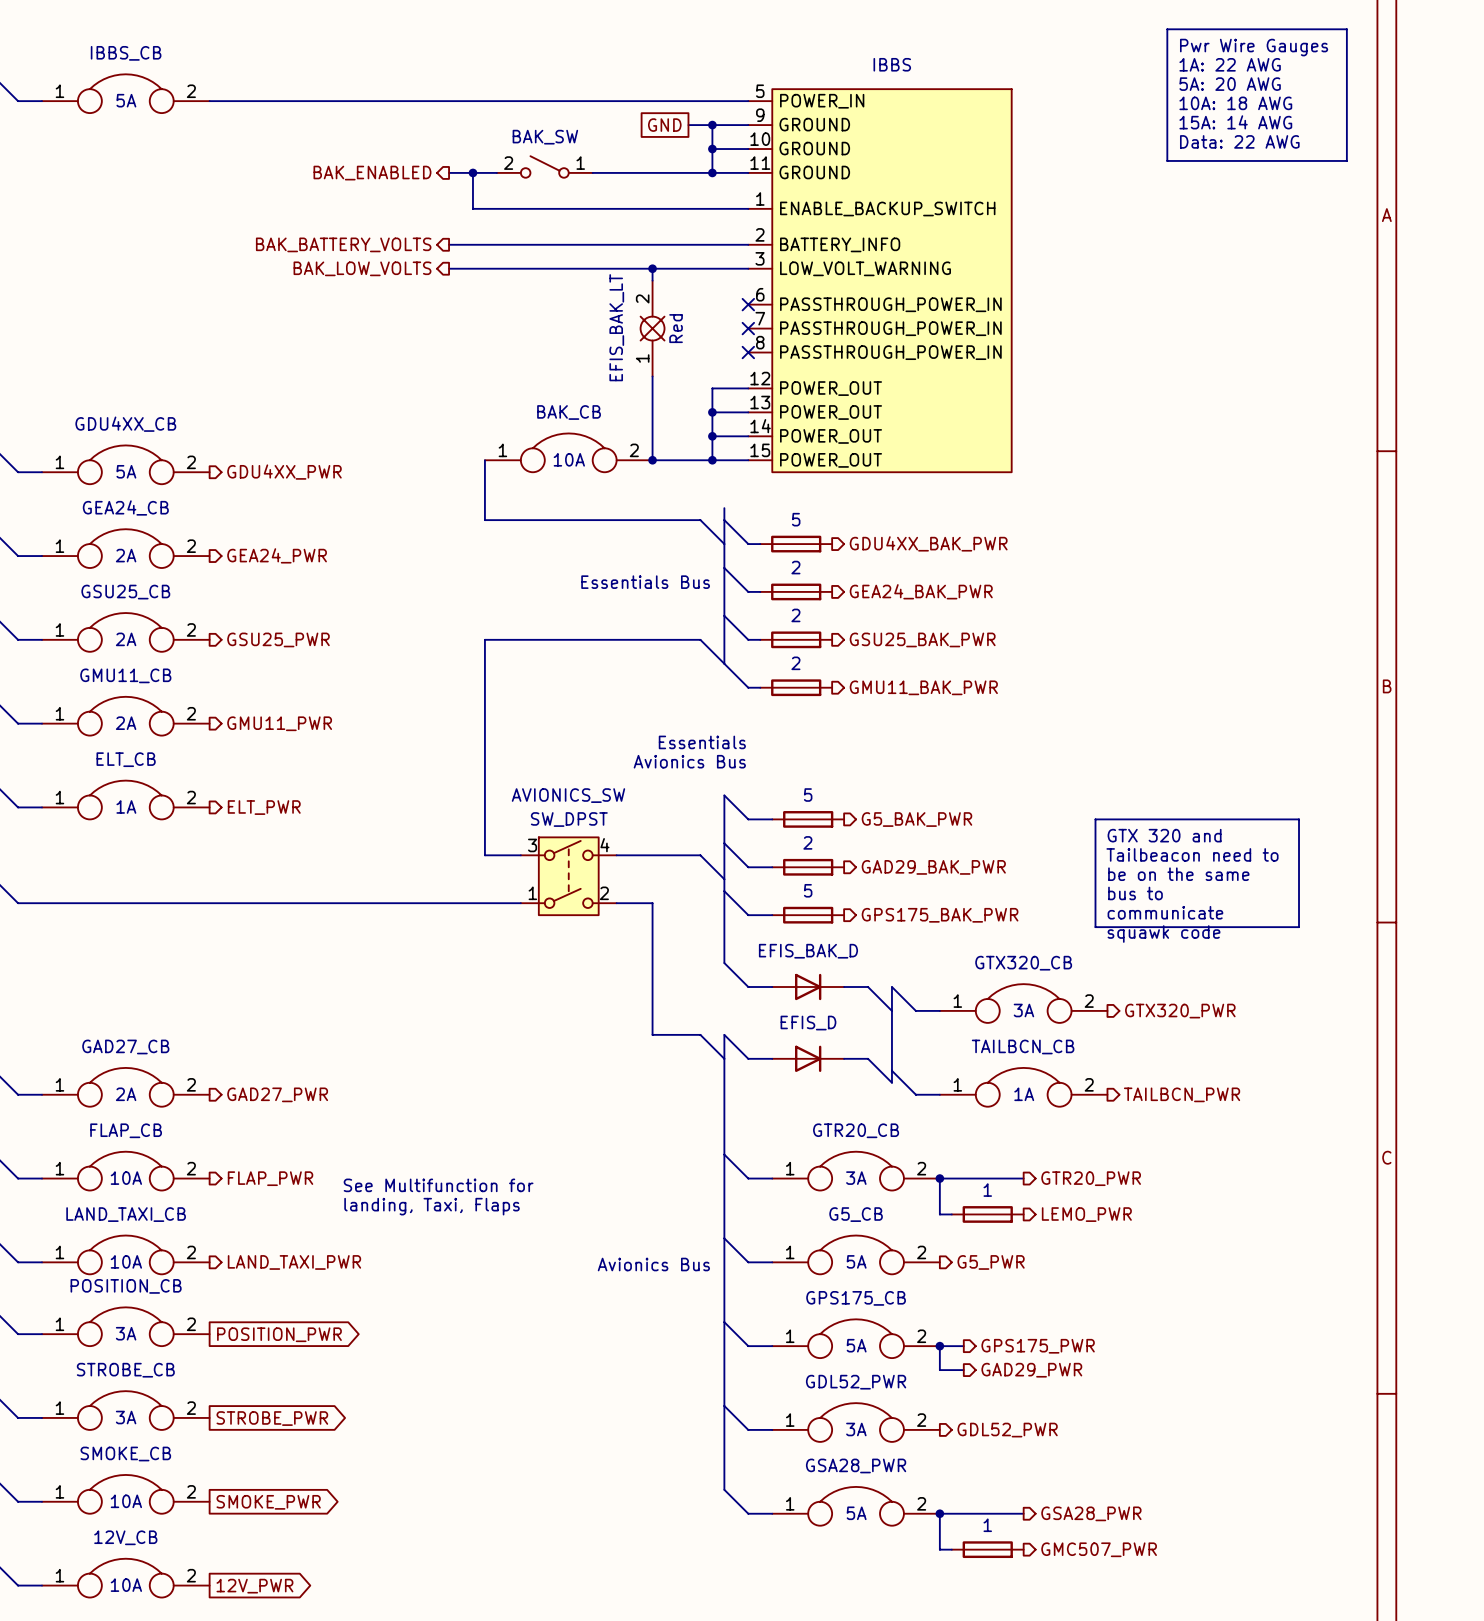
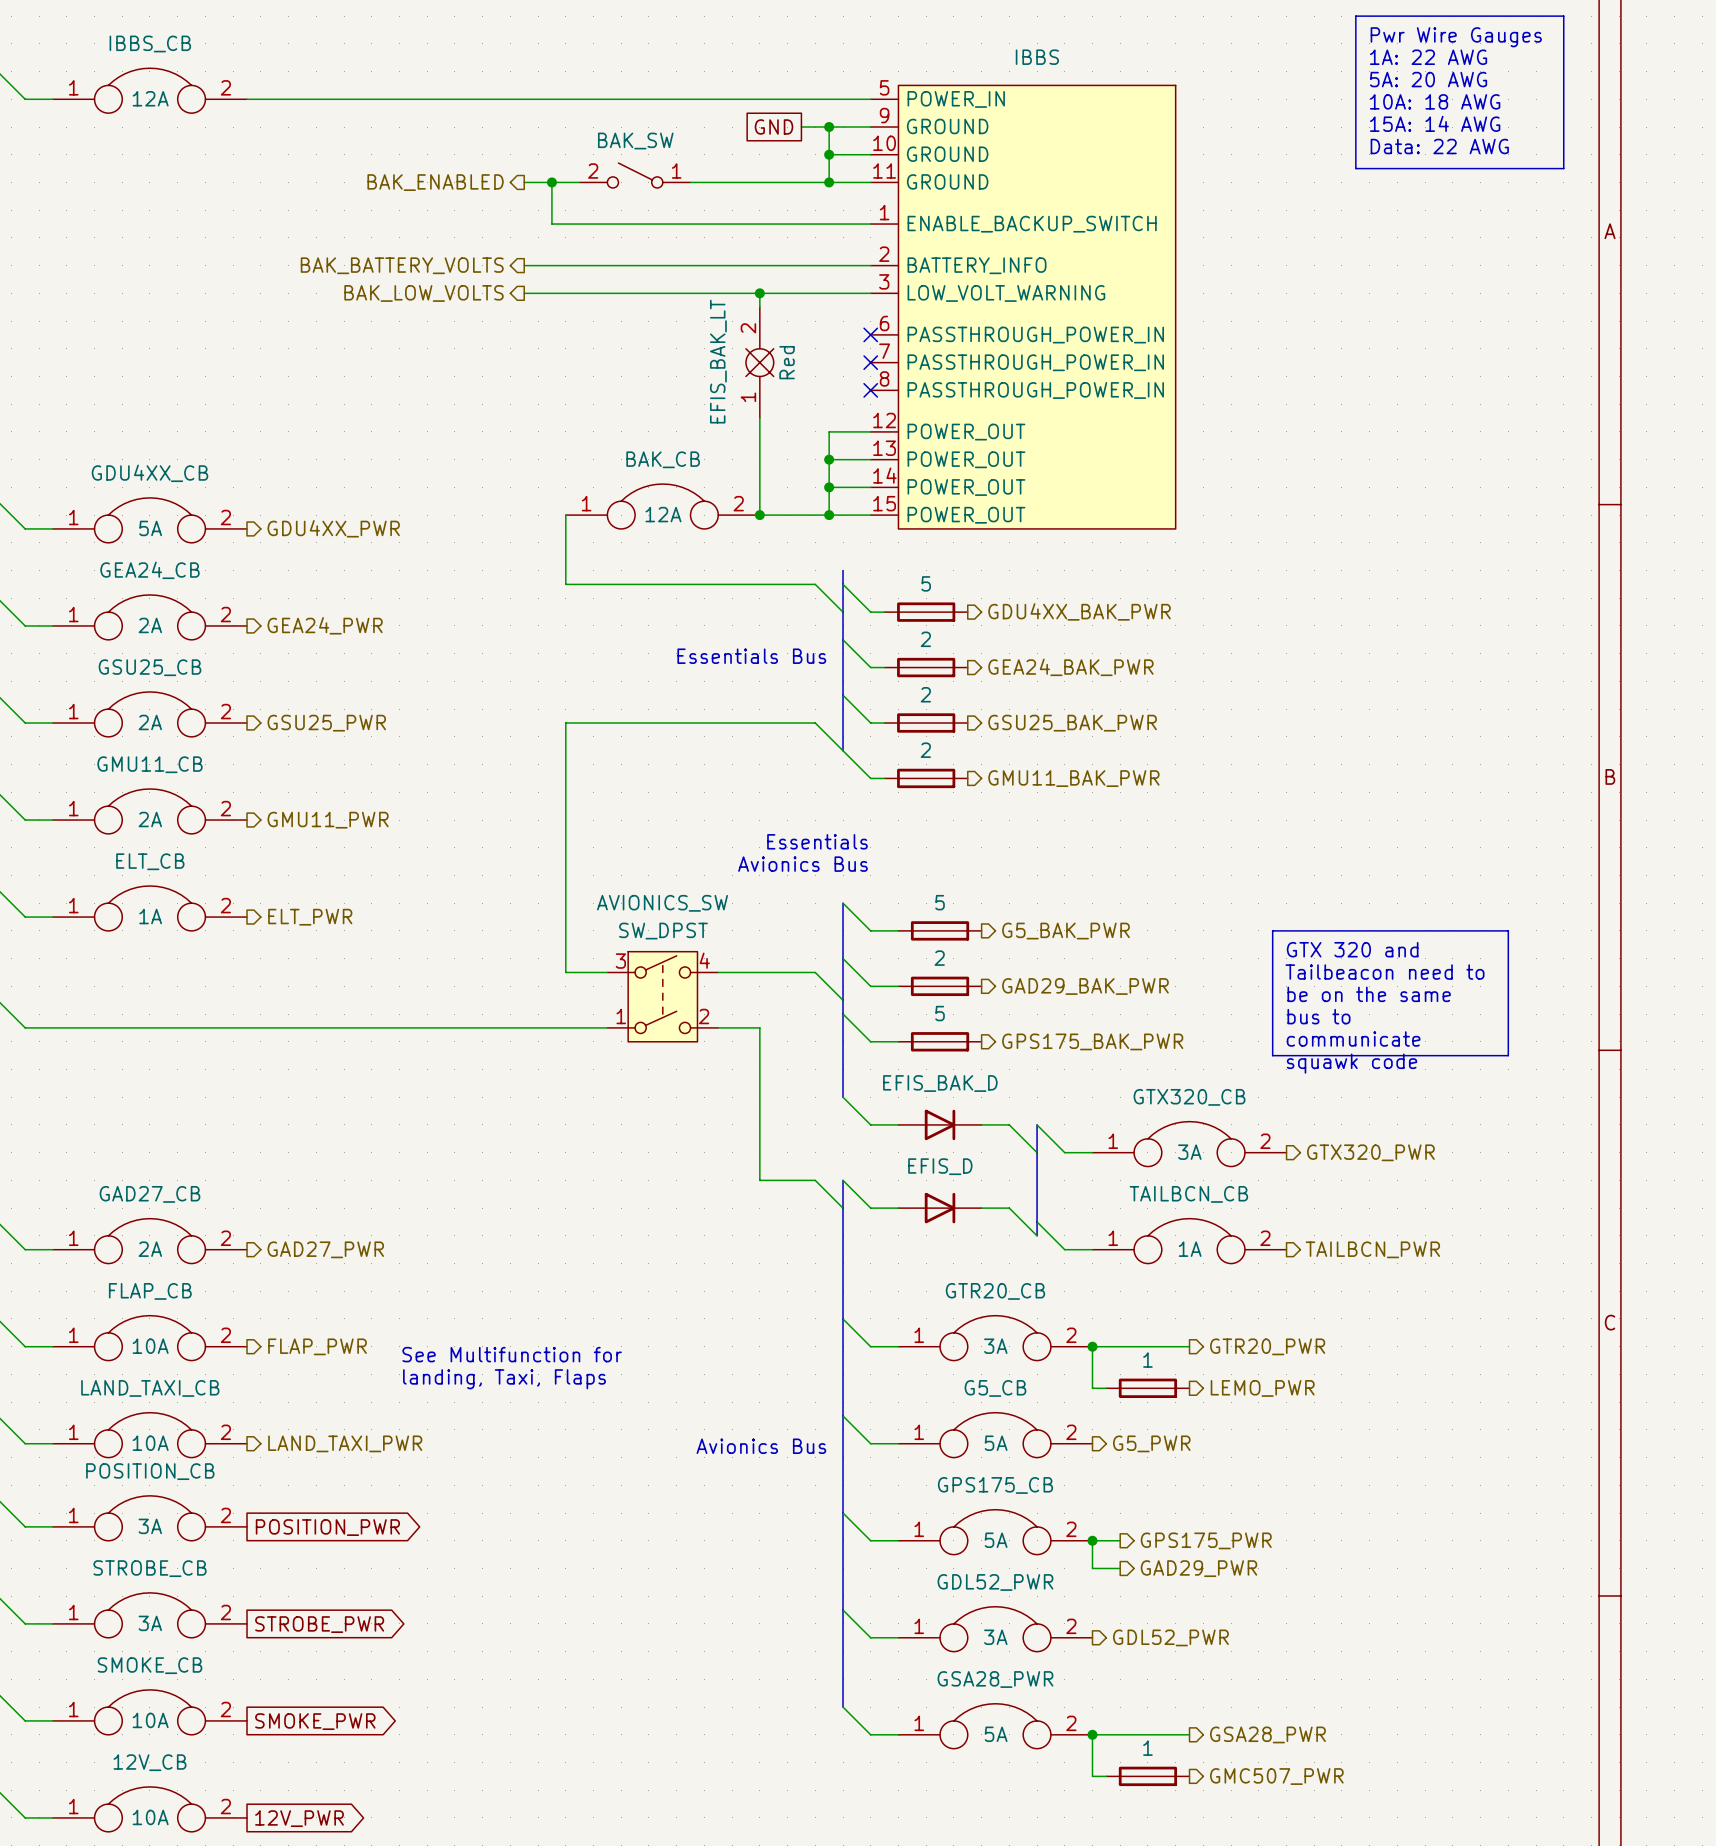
IBBS_CB value: 5A (126, 100) -> 12A (150, 98)
BAK_CB value: 10A (569, 459) -> 12A (663, 514)

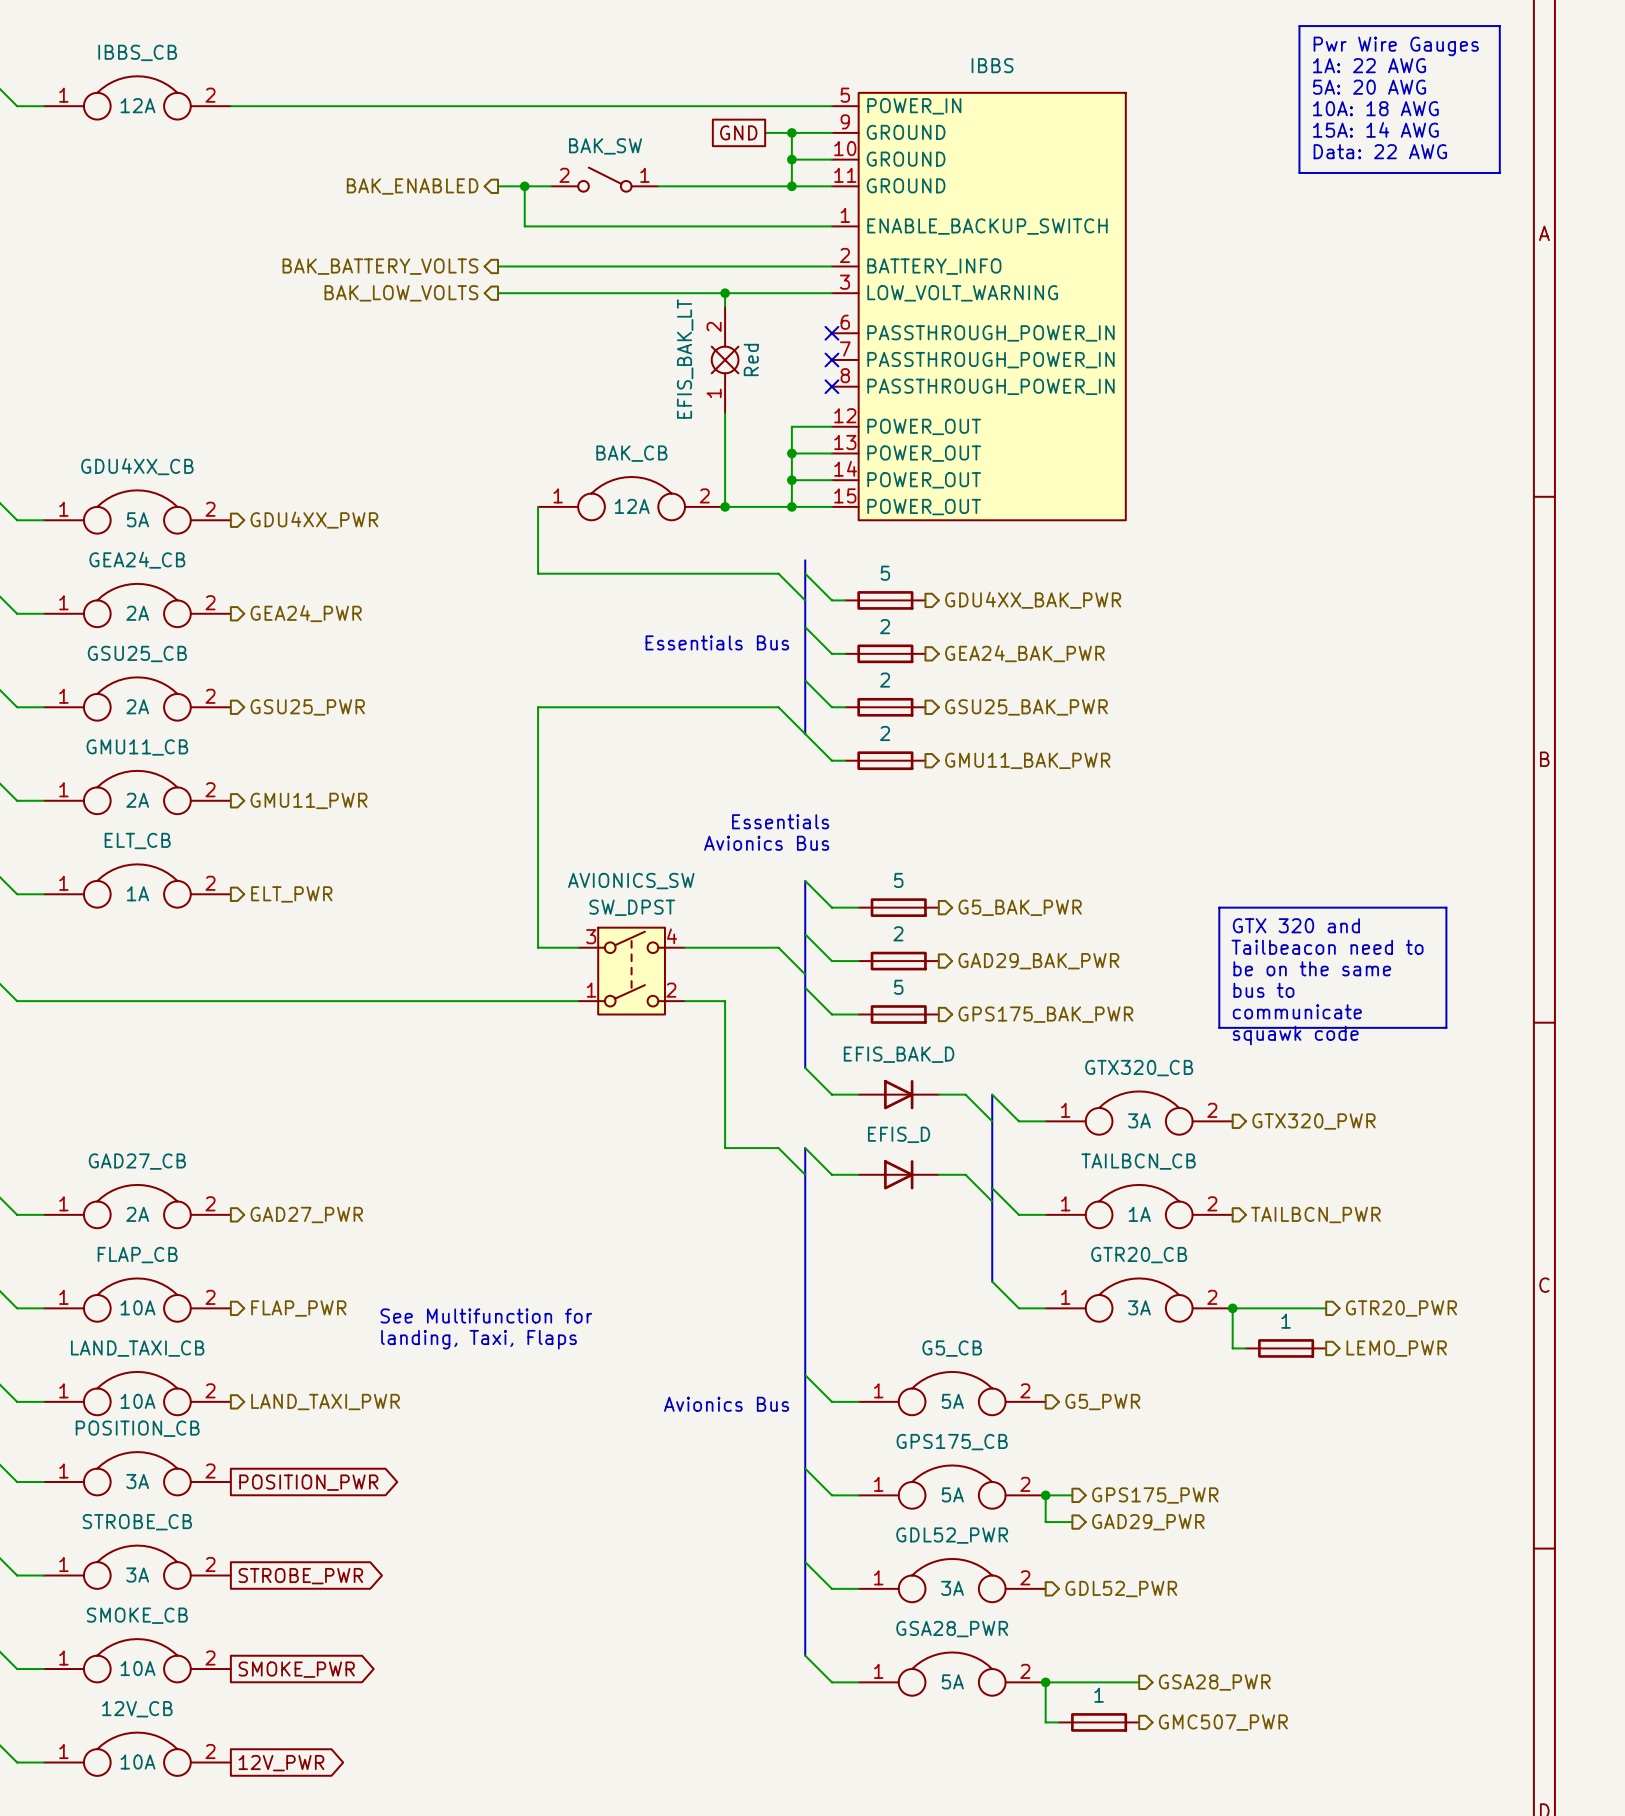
bus: none -> (992, 1201) (992, 1281)
wire: (843, 1318) (870, 1346) (898, 1346) -> (992, 1281) (1018, 1308) (1045, 1308)
GTR20_CB position: (995, 1338) -> (1139, 1300)
junction: (1092, 1346) -> none
wire: (1189, 1346) (1092, 1346) (1092, 1388) (1106, 1388) -> (1326, 1308) (1232, 1308) (1232, 1348) (1246, 1348)
hierarchical label position: GTR20_PWR (1267, 1346) -> GTR20_PWR (1401, 1308)
junction: none -> (1232, 1308)
part position: (1147, 1388) -> (1286, 1348)
hierarchical label position: LEMO_PWR (1262, 1388) -> LEMO_PWR (1396, 1348)

